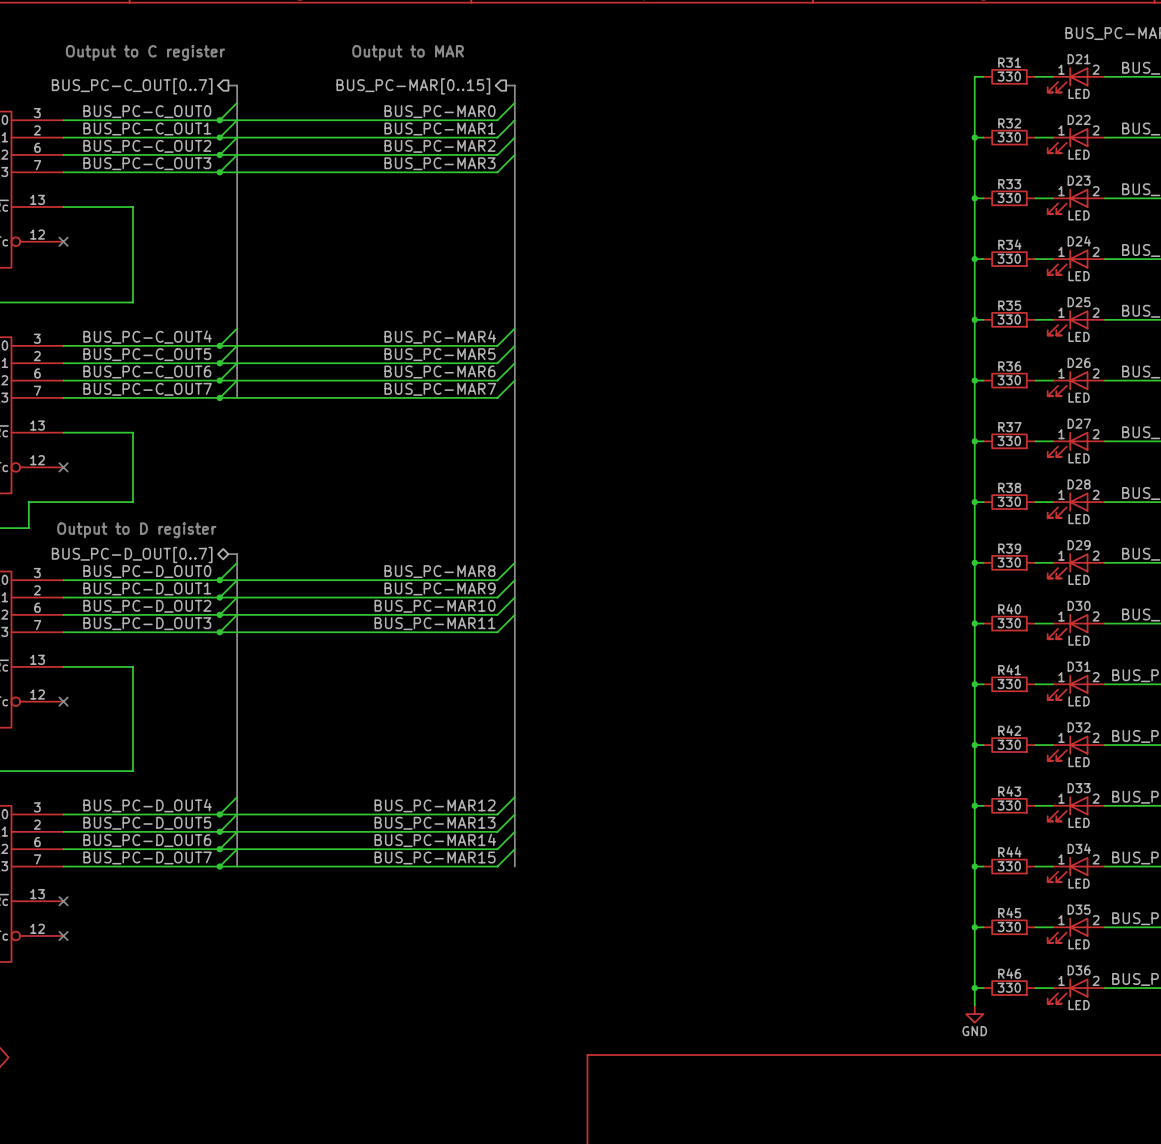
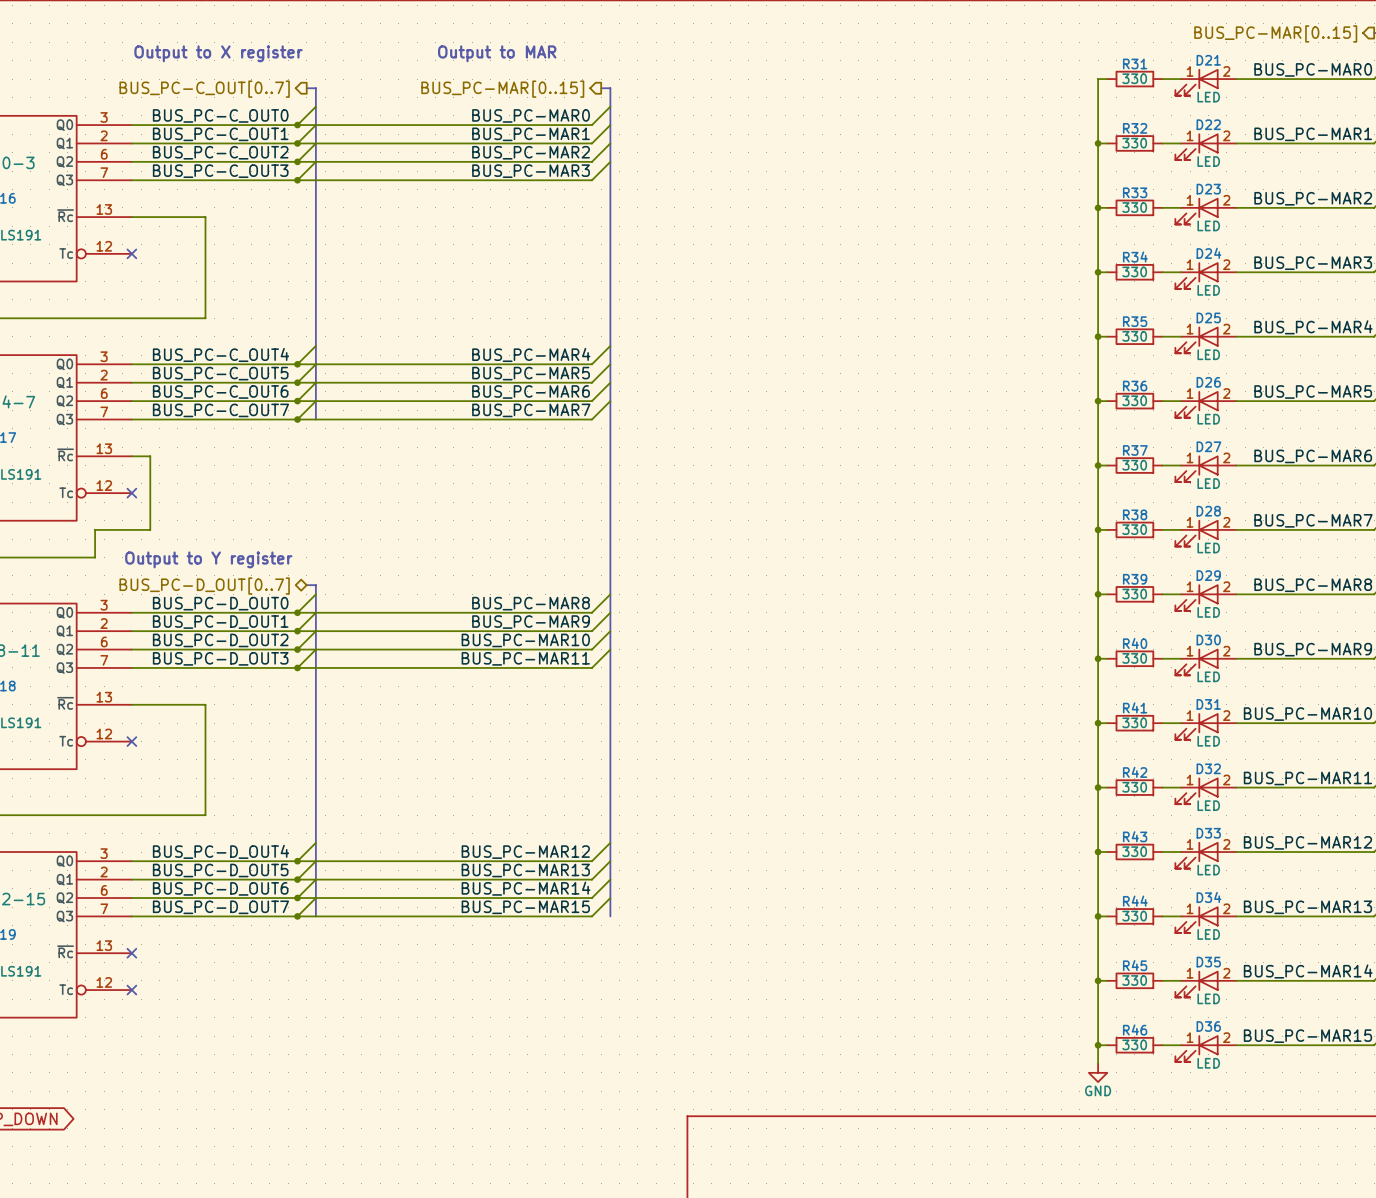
text: Output to C register (145, 53) -> Output to X register (218, 53)
wire: (80, 432) (132, 432) (132, 502) (80, 502) -> (150, 456) (150, 529)
text: Output to D register (136, 530) -> Output to Y register (208, 559)

